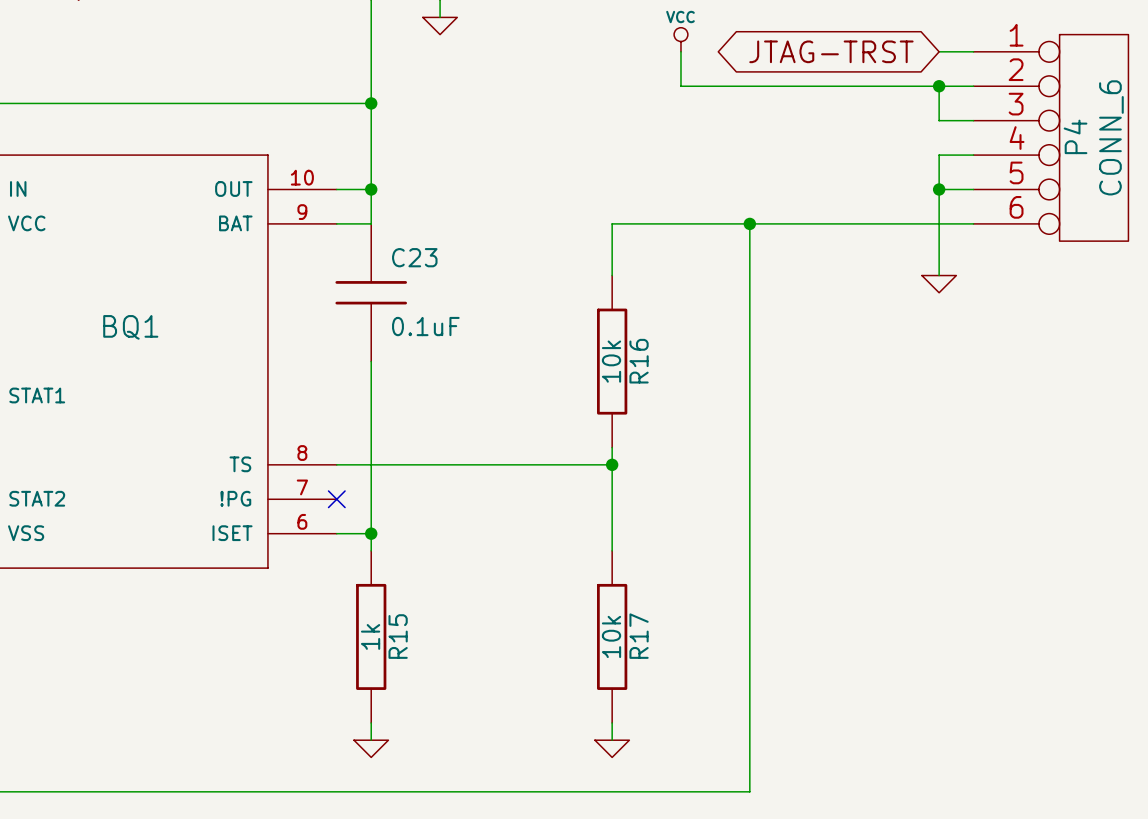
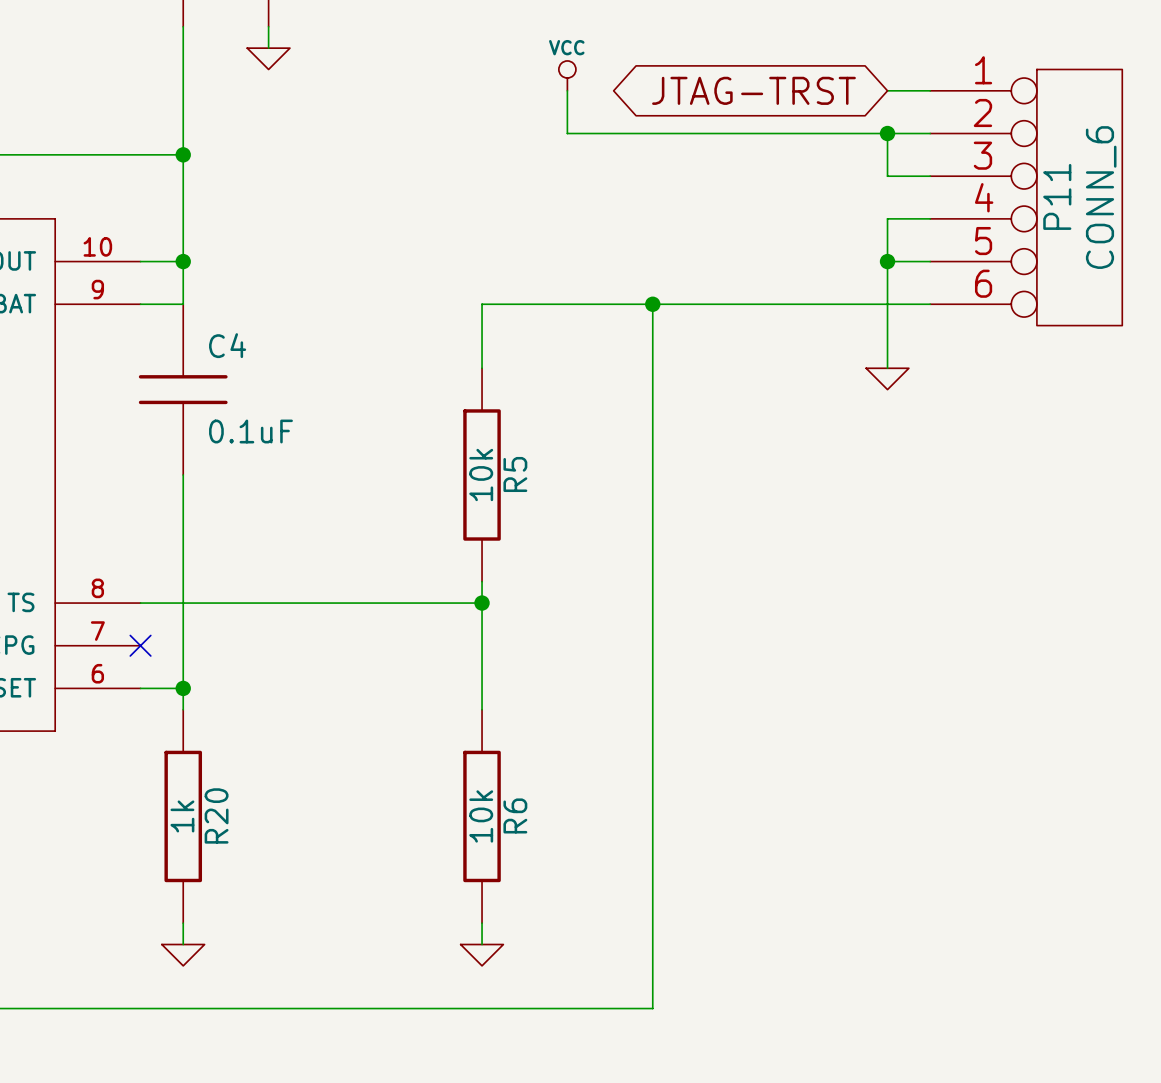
P4 name: P4 (1075, 136) -> P11 (1057, 196)
C23 name: C23 (414, 257) -> C4 (227, 345)
R16 name: R16 (639, 361) -> R5 (515, 474)
R15 name: R15 (398, 636) -> R20 (216, 815)
R17 name: R17 (639, 636) -> R6 (515, 815)

